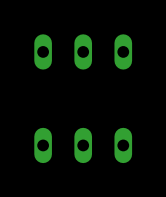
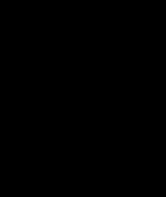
part: (83, 51) -> none
part: (83, 145) -> none

